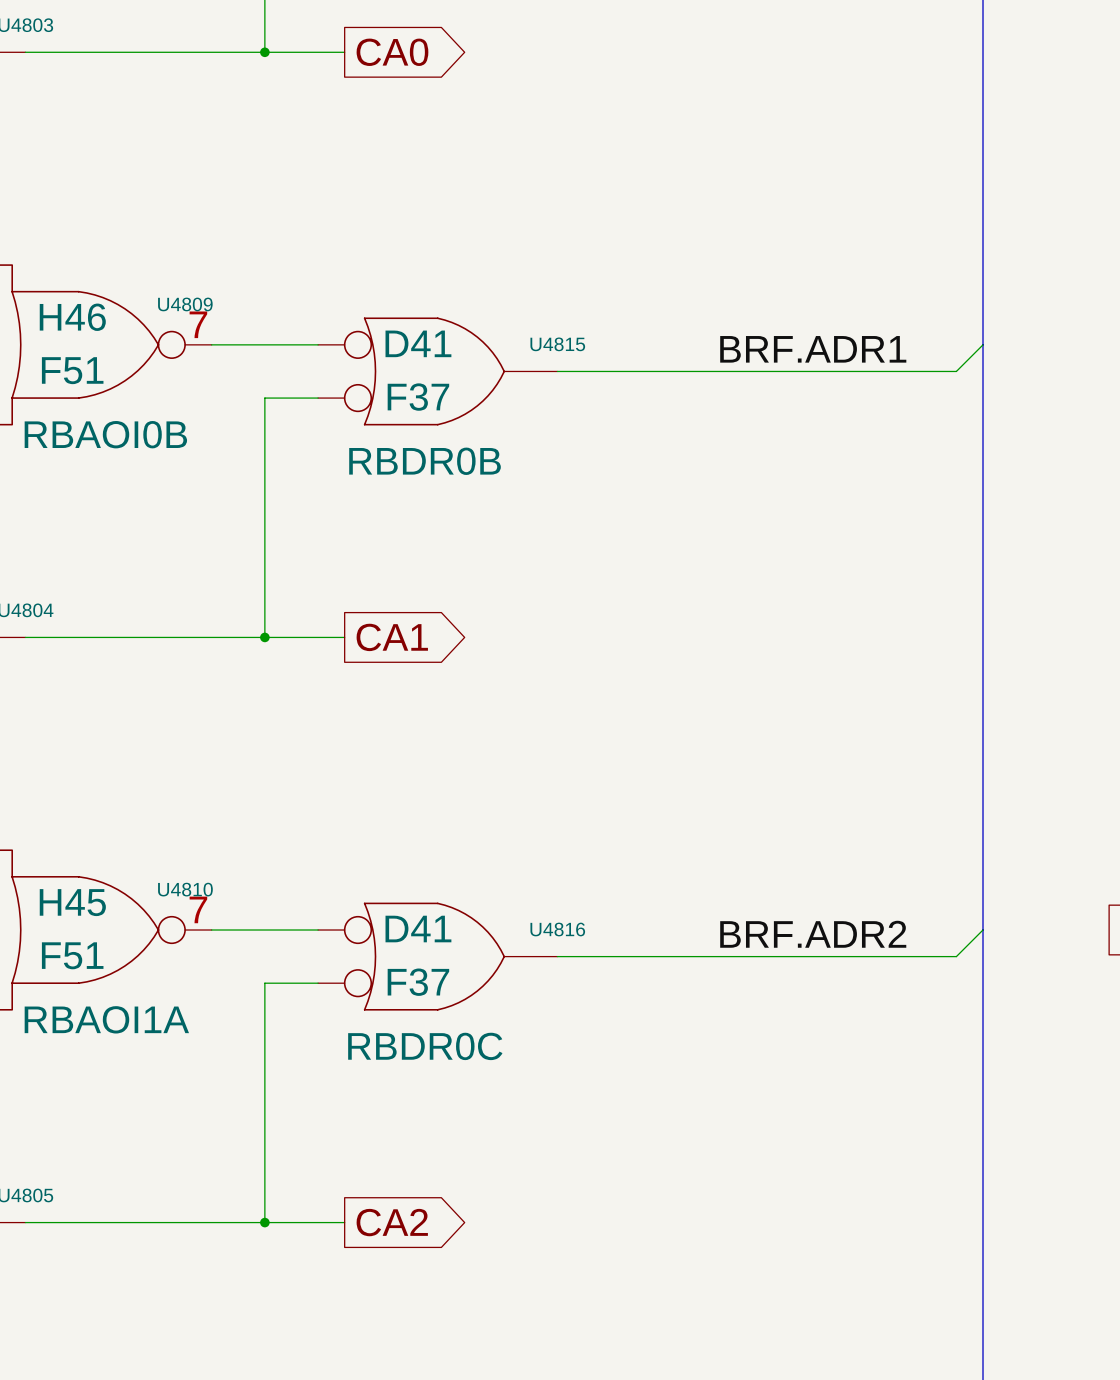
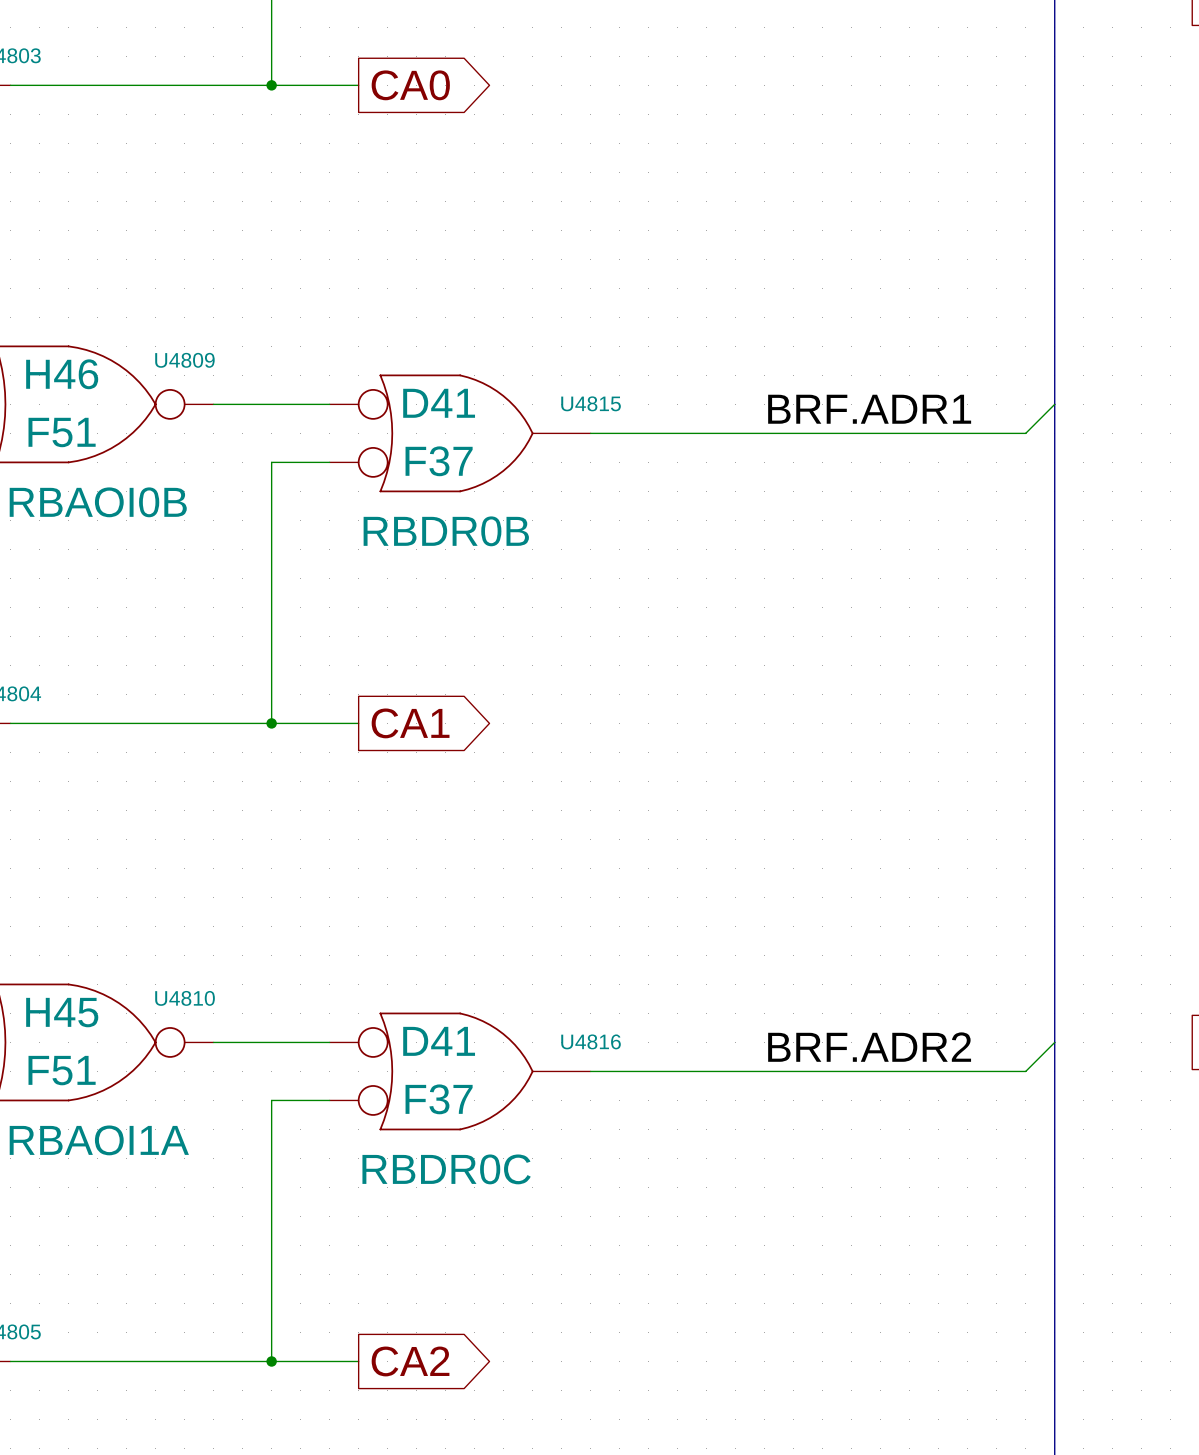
U4809 pin number: 7 (198, 324) -> none
U4810 pin number: 7 (198, 909) -> none

